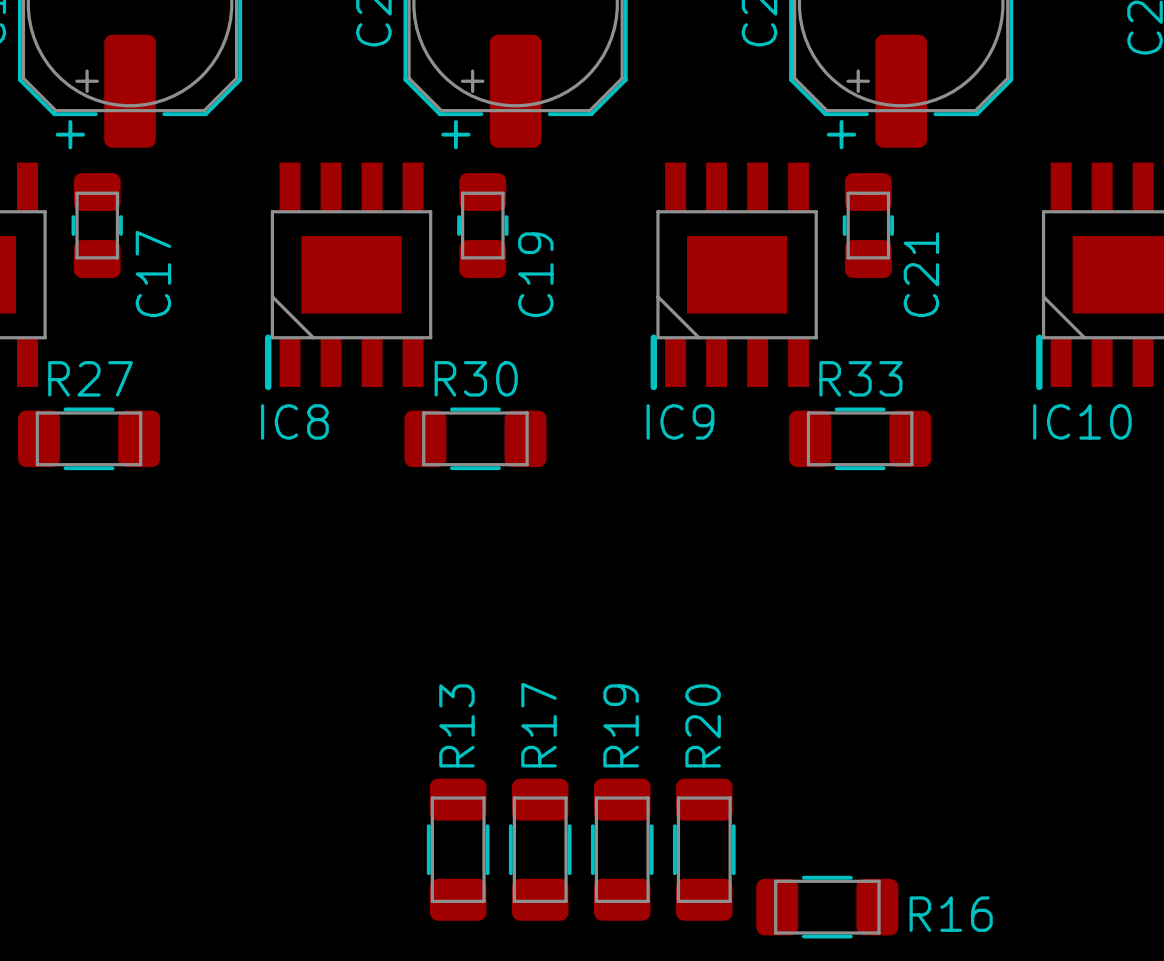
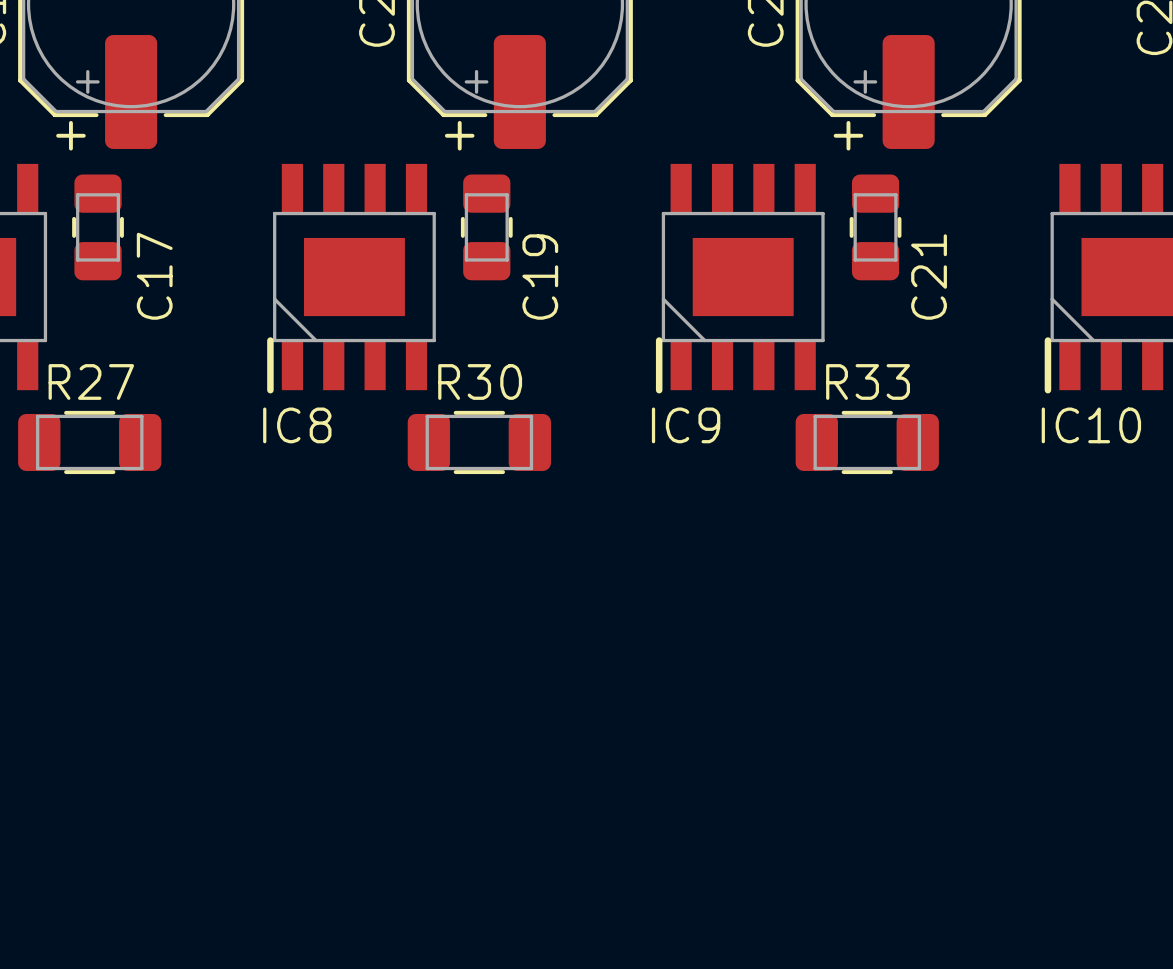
R13: (458, 849) -> none
R17: (540, 849) -> none
R19: (622, 849) -> none
R20: (704, 849) -> none
R16: (827, 907) -> none

